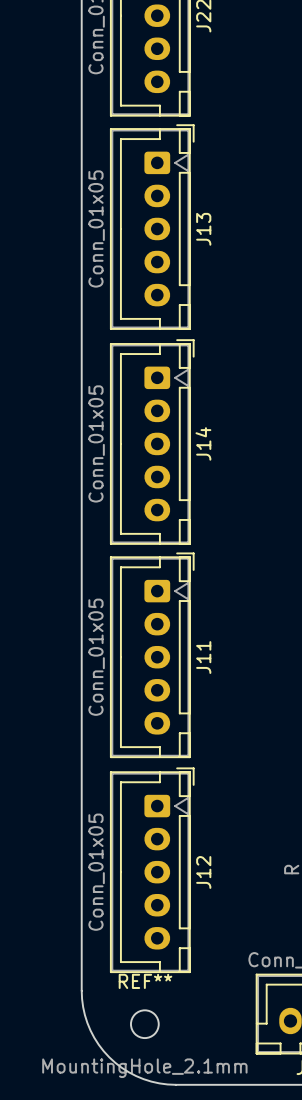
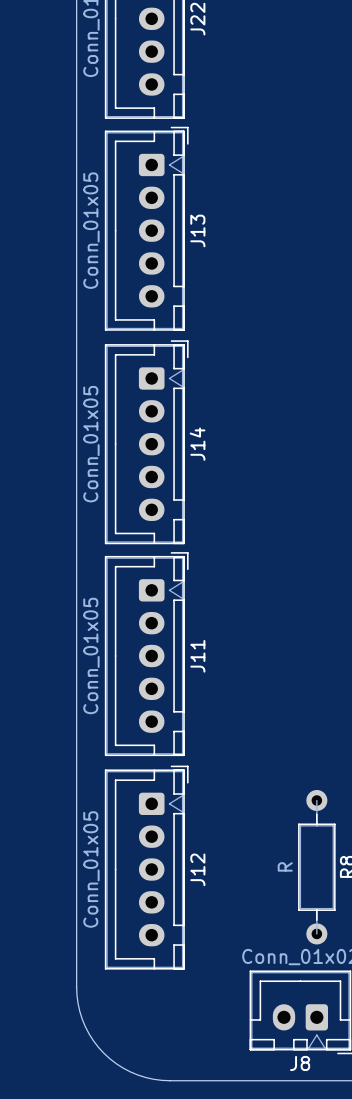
REF**: MountingHole_2.1mm (144, 1024) -> none

